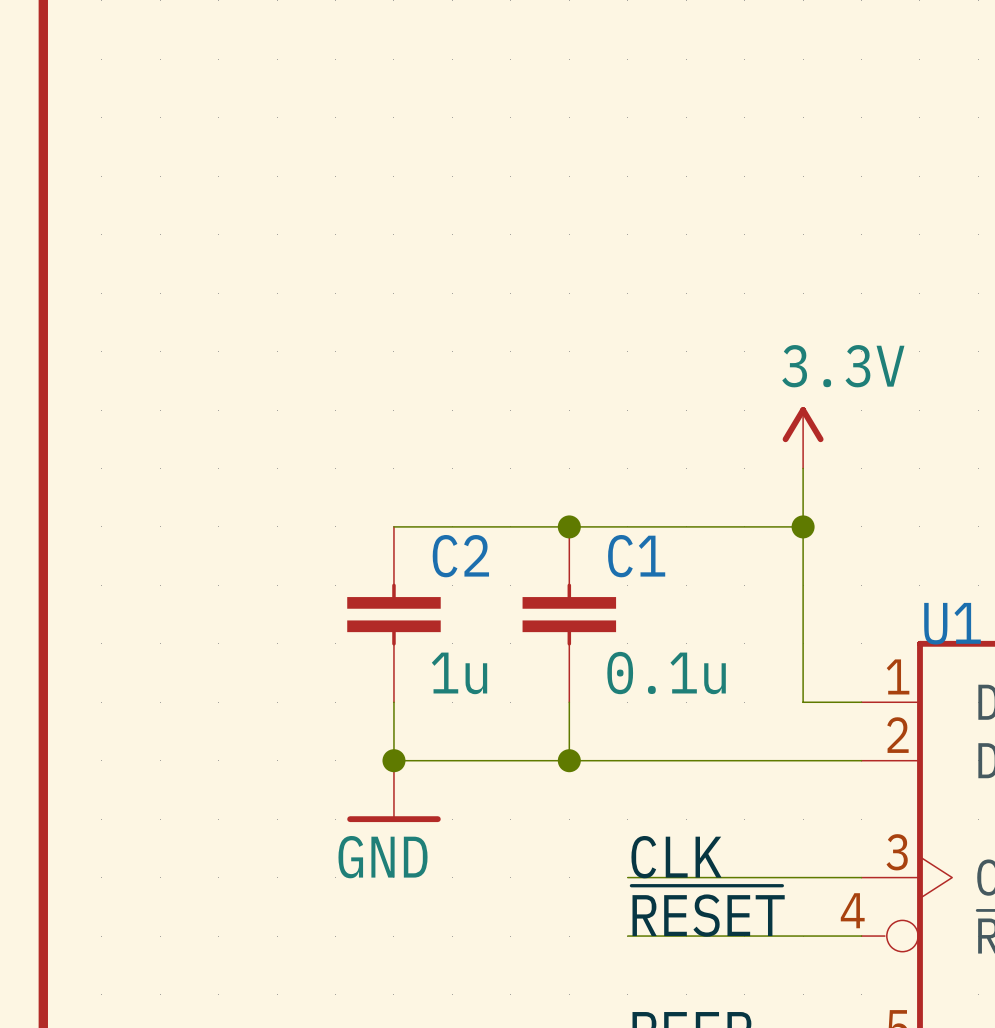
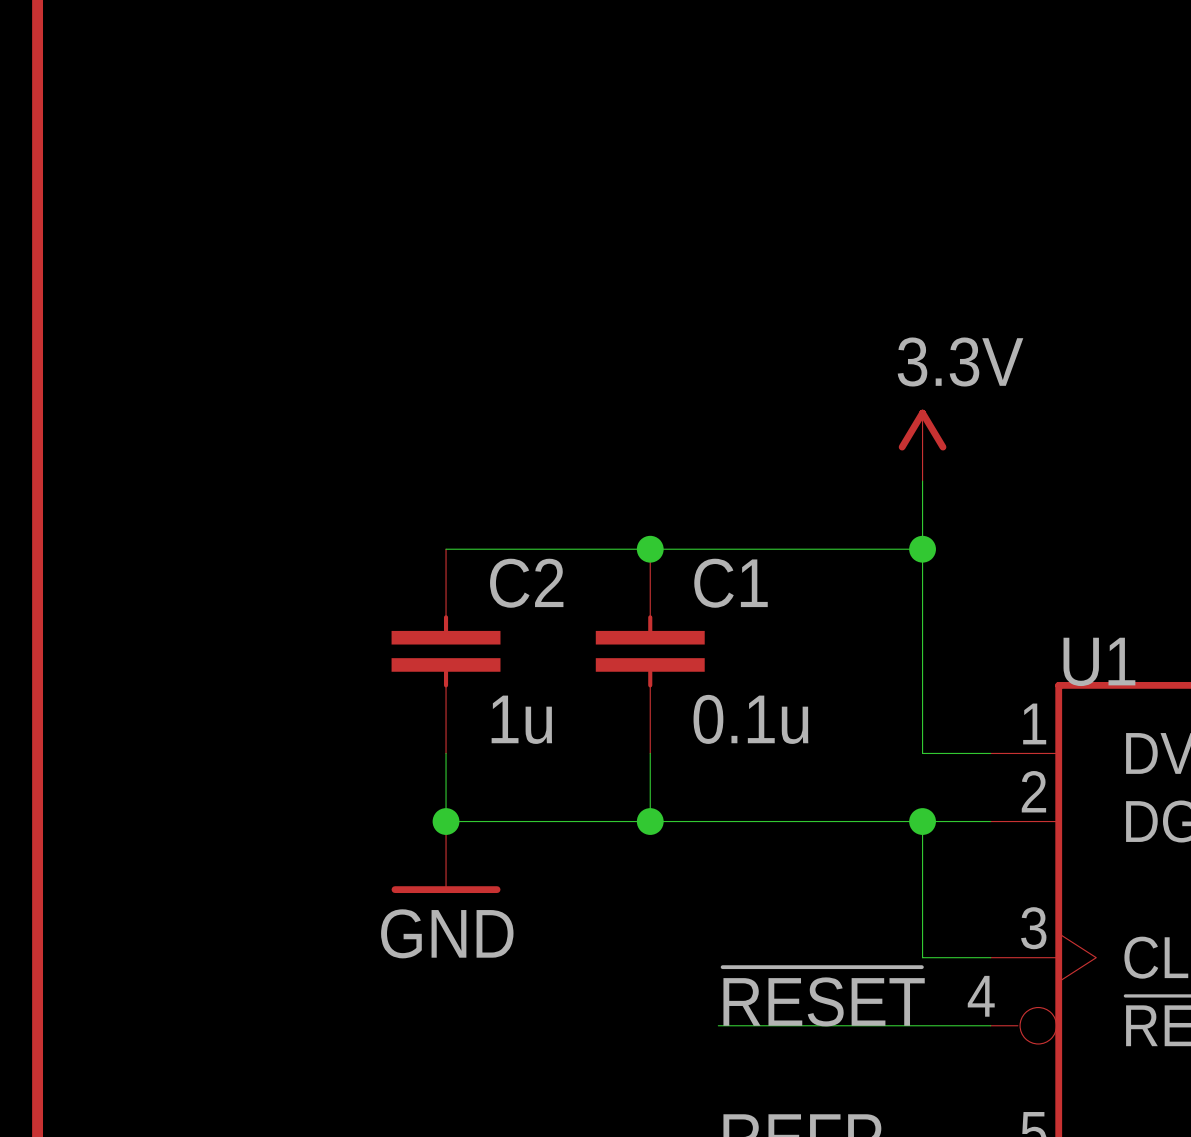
junction: none -> (922, 821)
label: CLK (676, 857) -> none
wire: (627, 877) (803, 877) -> (922, 821) (922, 957)

